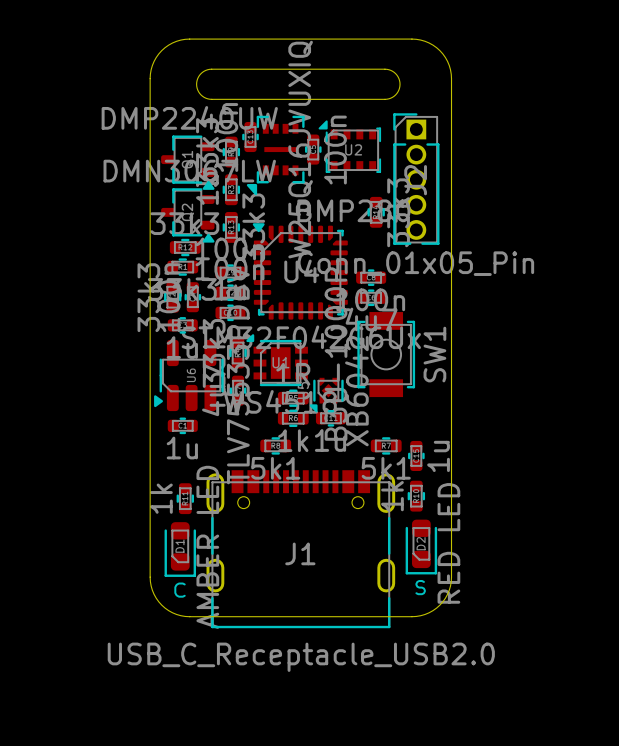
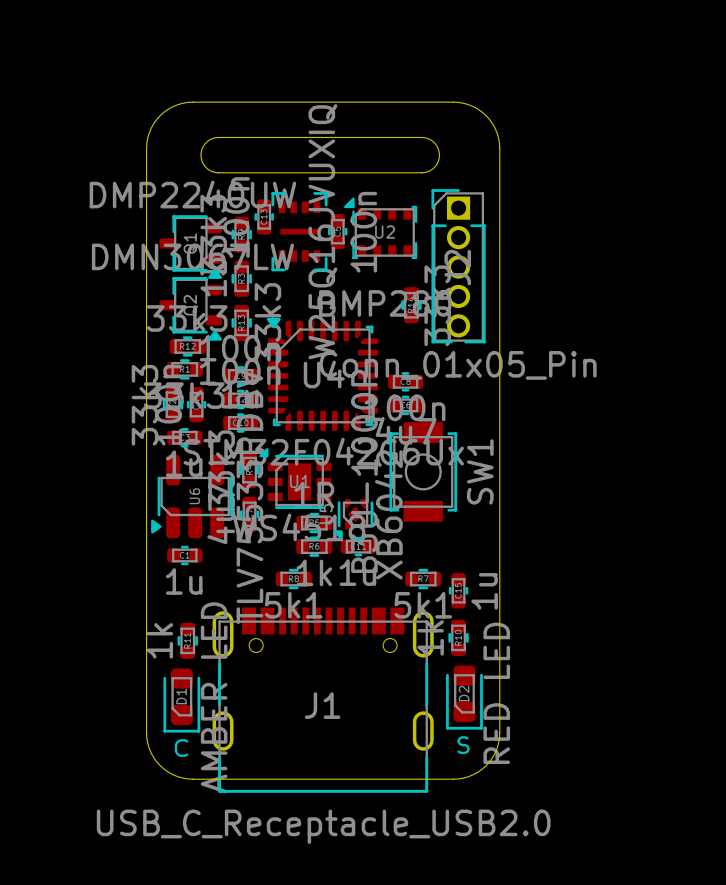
part footprint: [246, 115, 305, 196] -> [271, 192, 328, 272]

